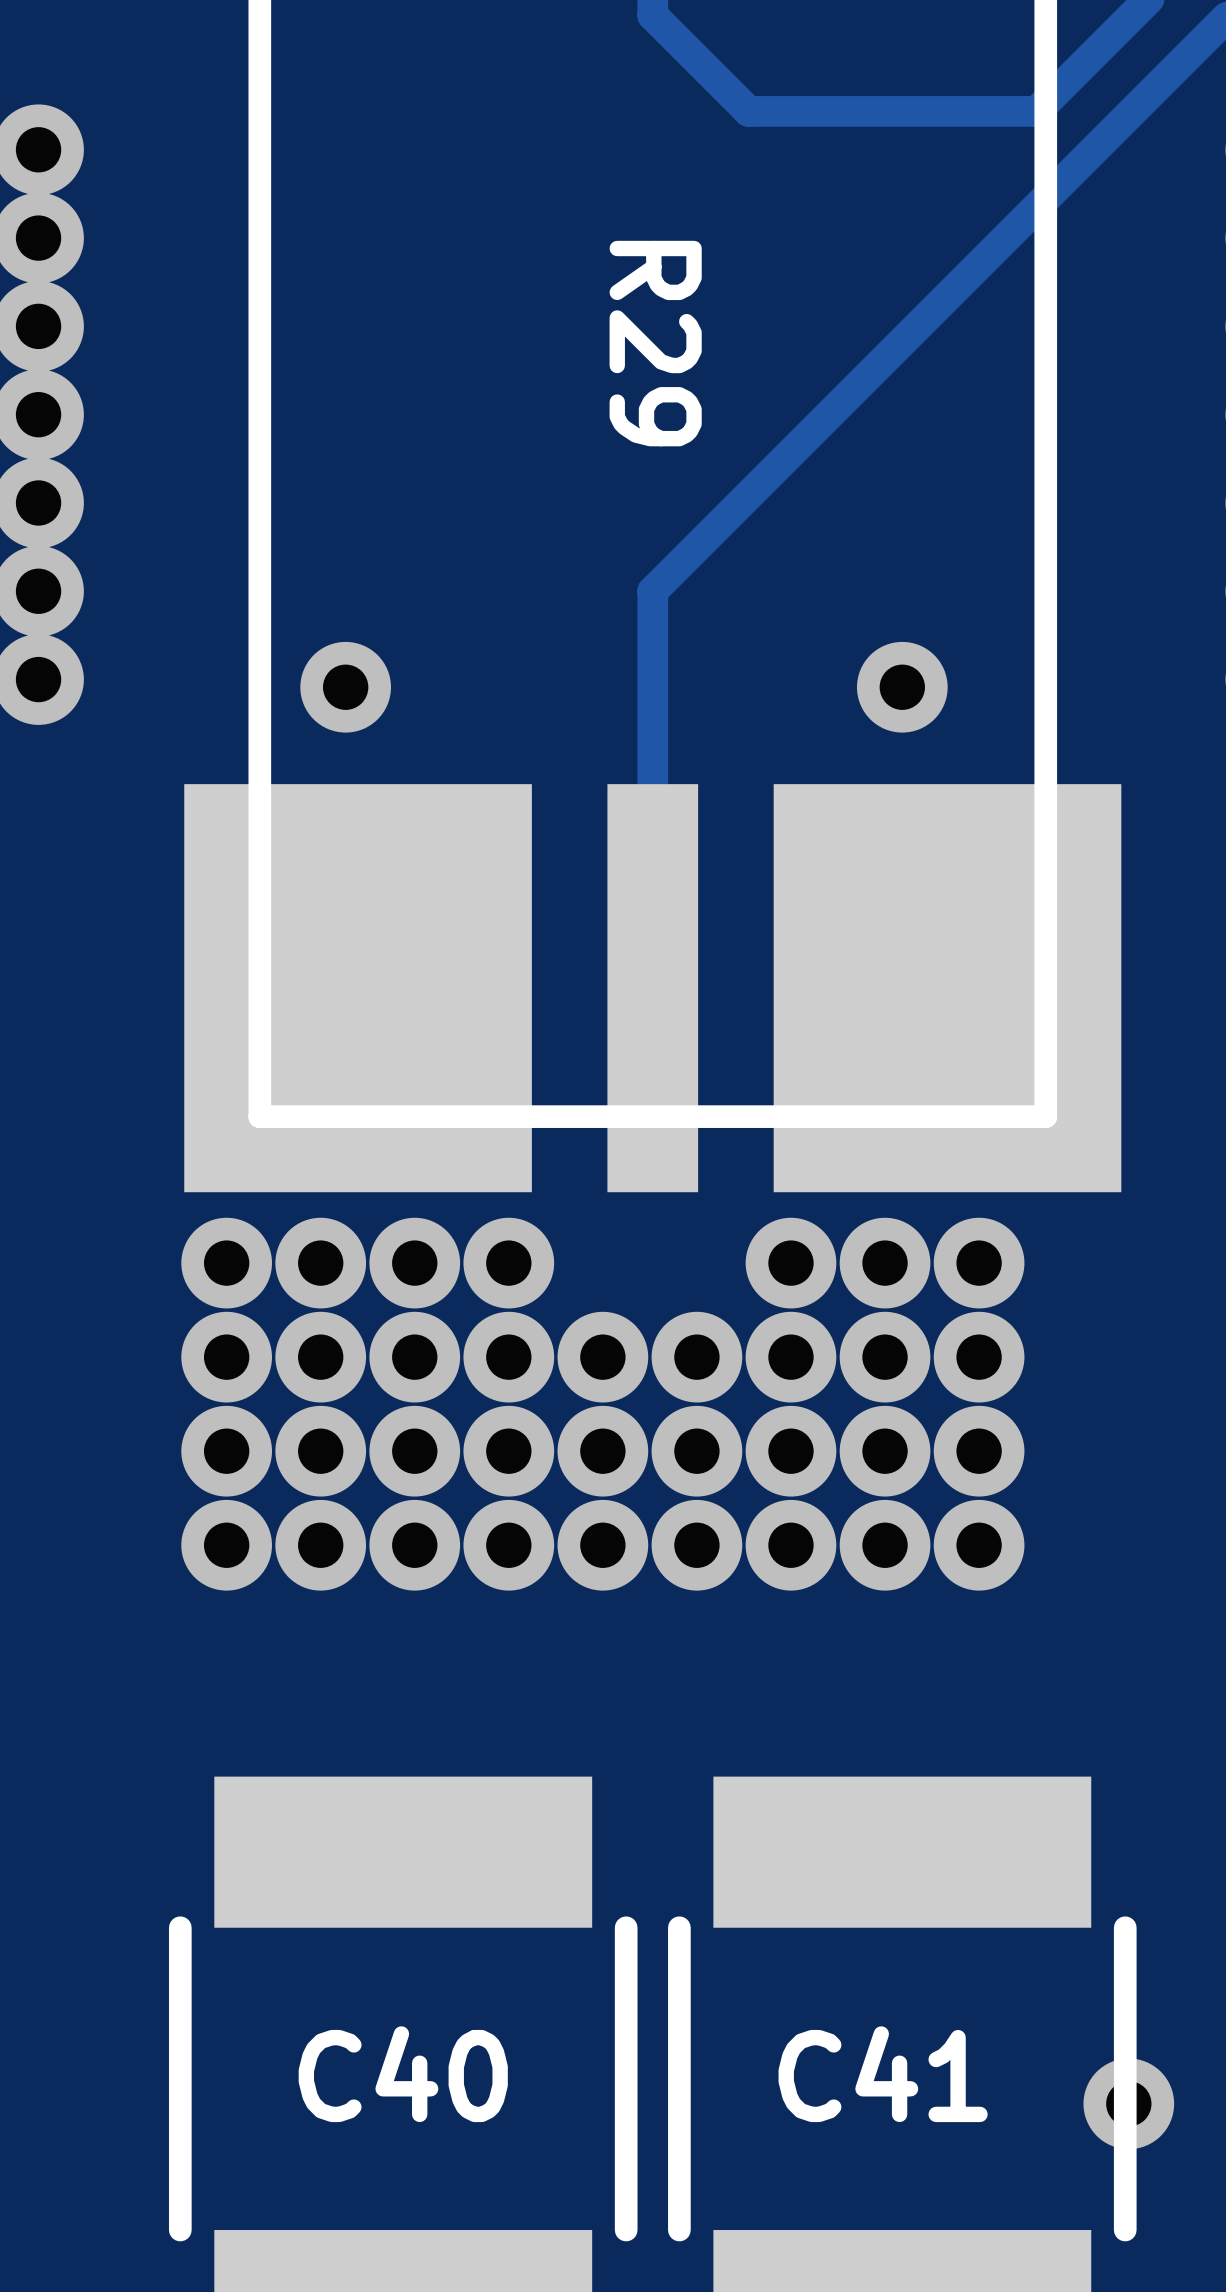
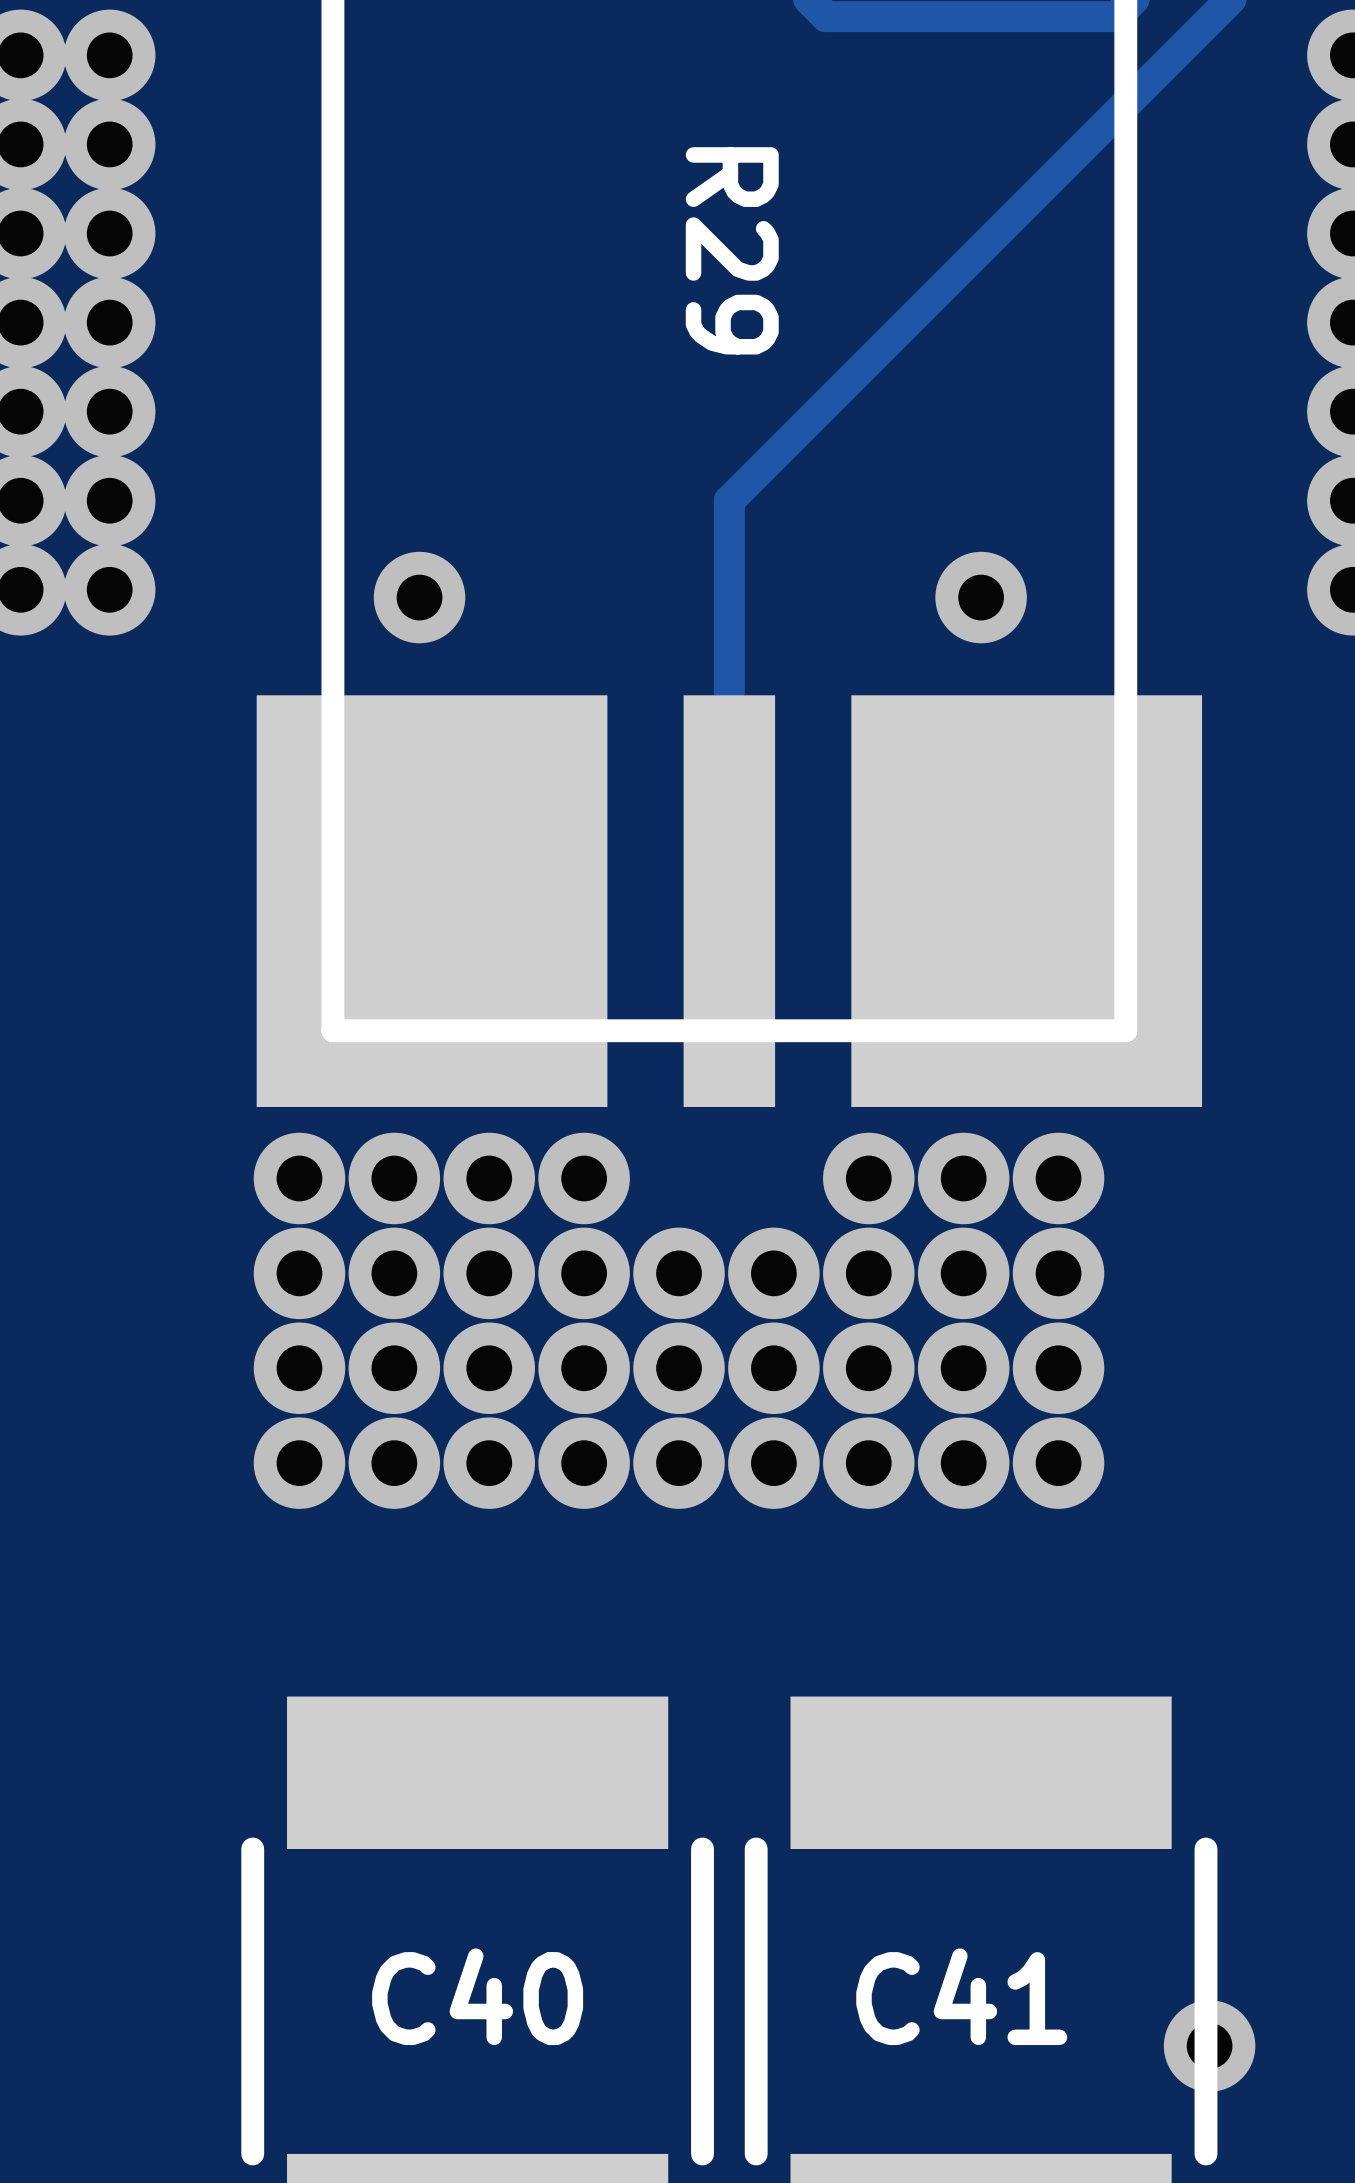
via position: (1128, 2103) -> (1209, 2046)

